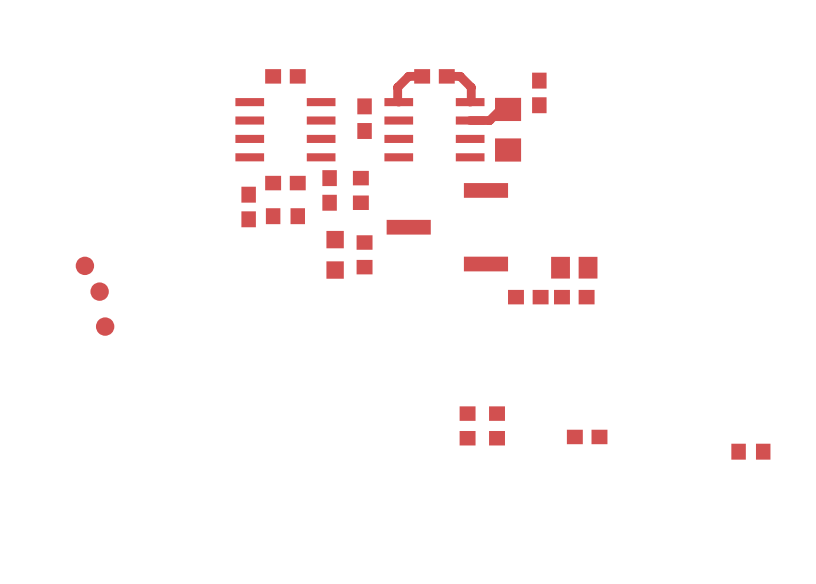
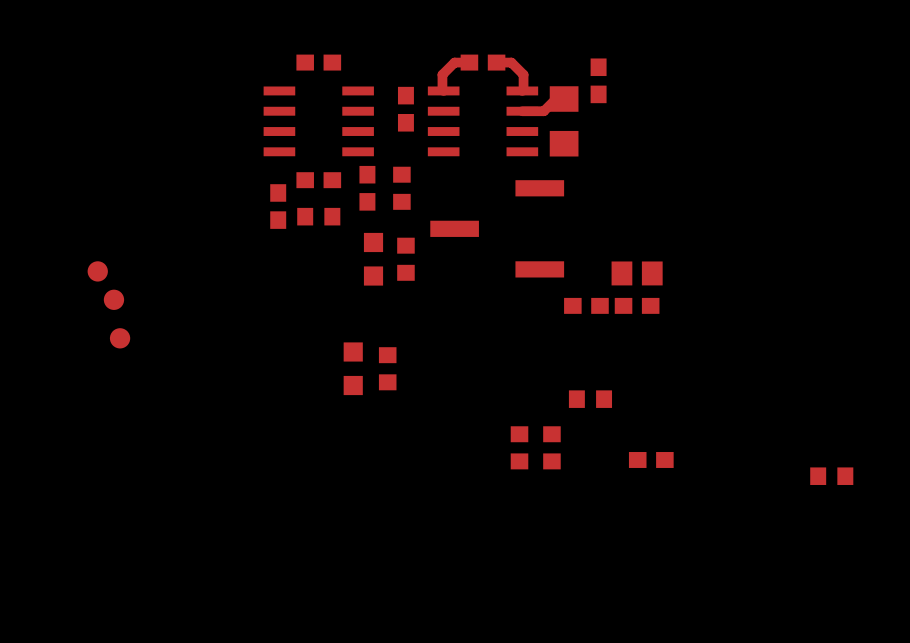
part: none -> (353, 368)
part: none -> (387, 368)
part: none -> (590, 399)

